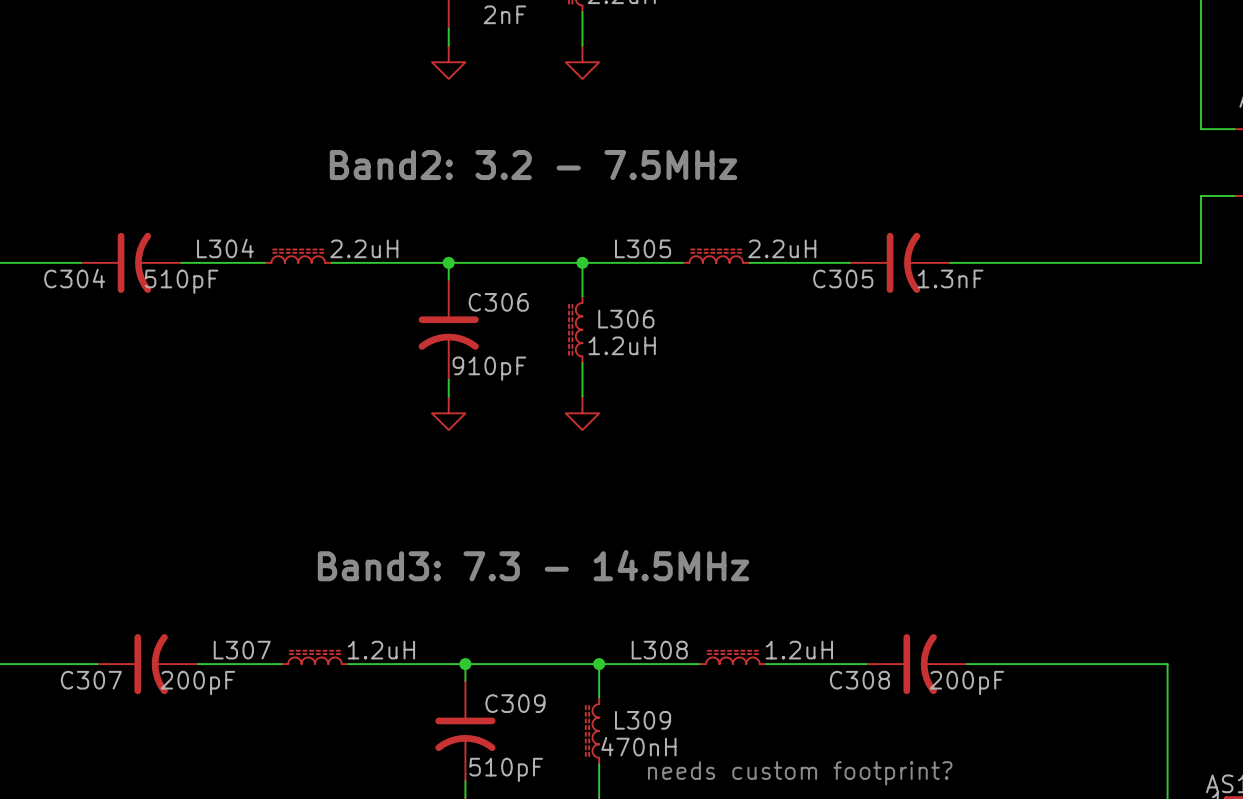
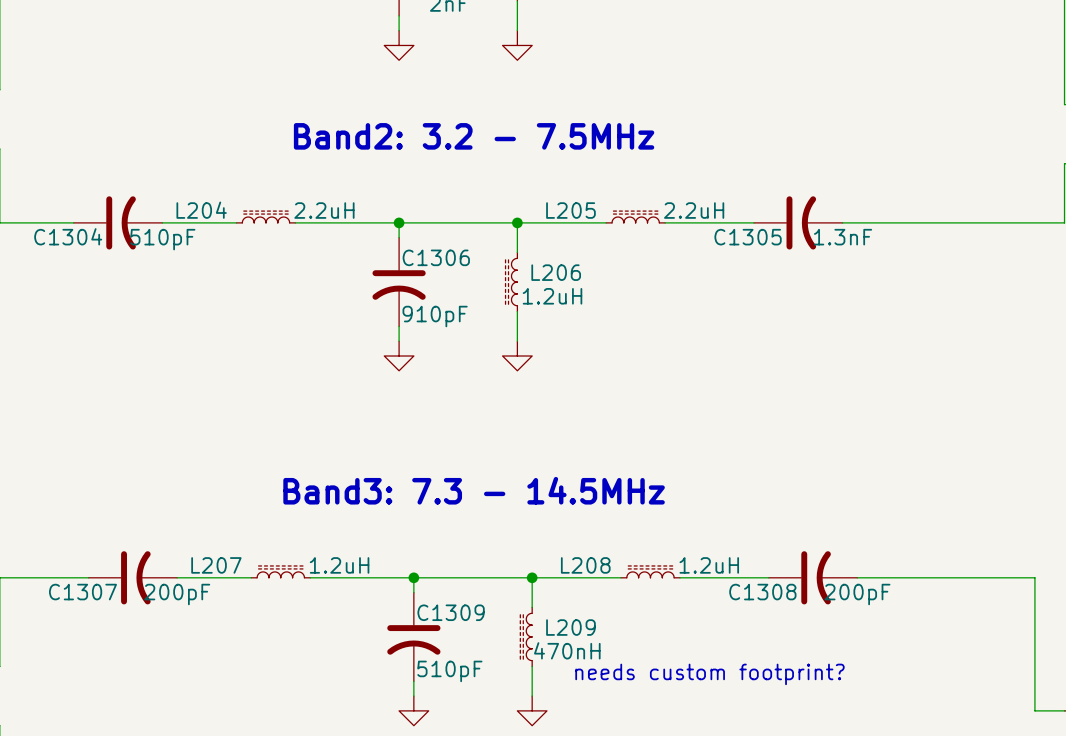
L304 name: L304 (225, 248) -> L204 (201, 210)
L305 name: L305 (643, 248) -> L205 (570, 210)
C304 name: C304 (74, 278) -> C1304 (68, 236)
C305 name: C305 (843, 278) -> C1305 (748, 237)
C306 name: C306 (498, 302) -> C1306 (436, 257)
L306 name: L306 (626, 319) -> L206 (556, 272)
L307 name: L307 (242, 650) -> L207 (216, 565)
L308 name: L308 (659, 650) -> L208 (585, 565)
C307 name: C307 (91, 680) -> C1307 (82, 592)
C308 name: C308 (859, 680) -> C1308 (762, 592)
C309 name: C309 (515, 703) -> C1309 (451, 612)
L309 name: L309 (643, 720) -> L209 (570, 627)

